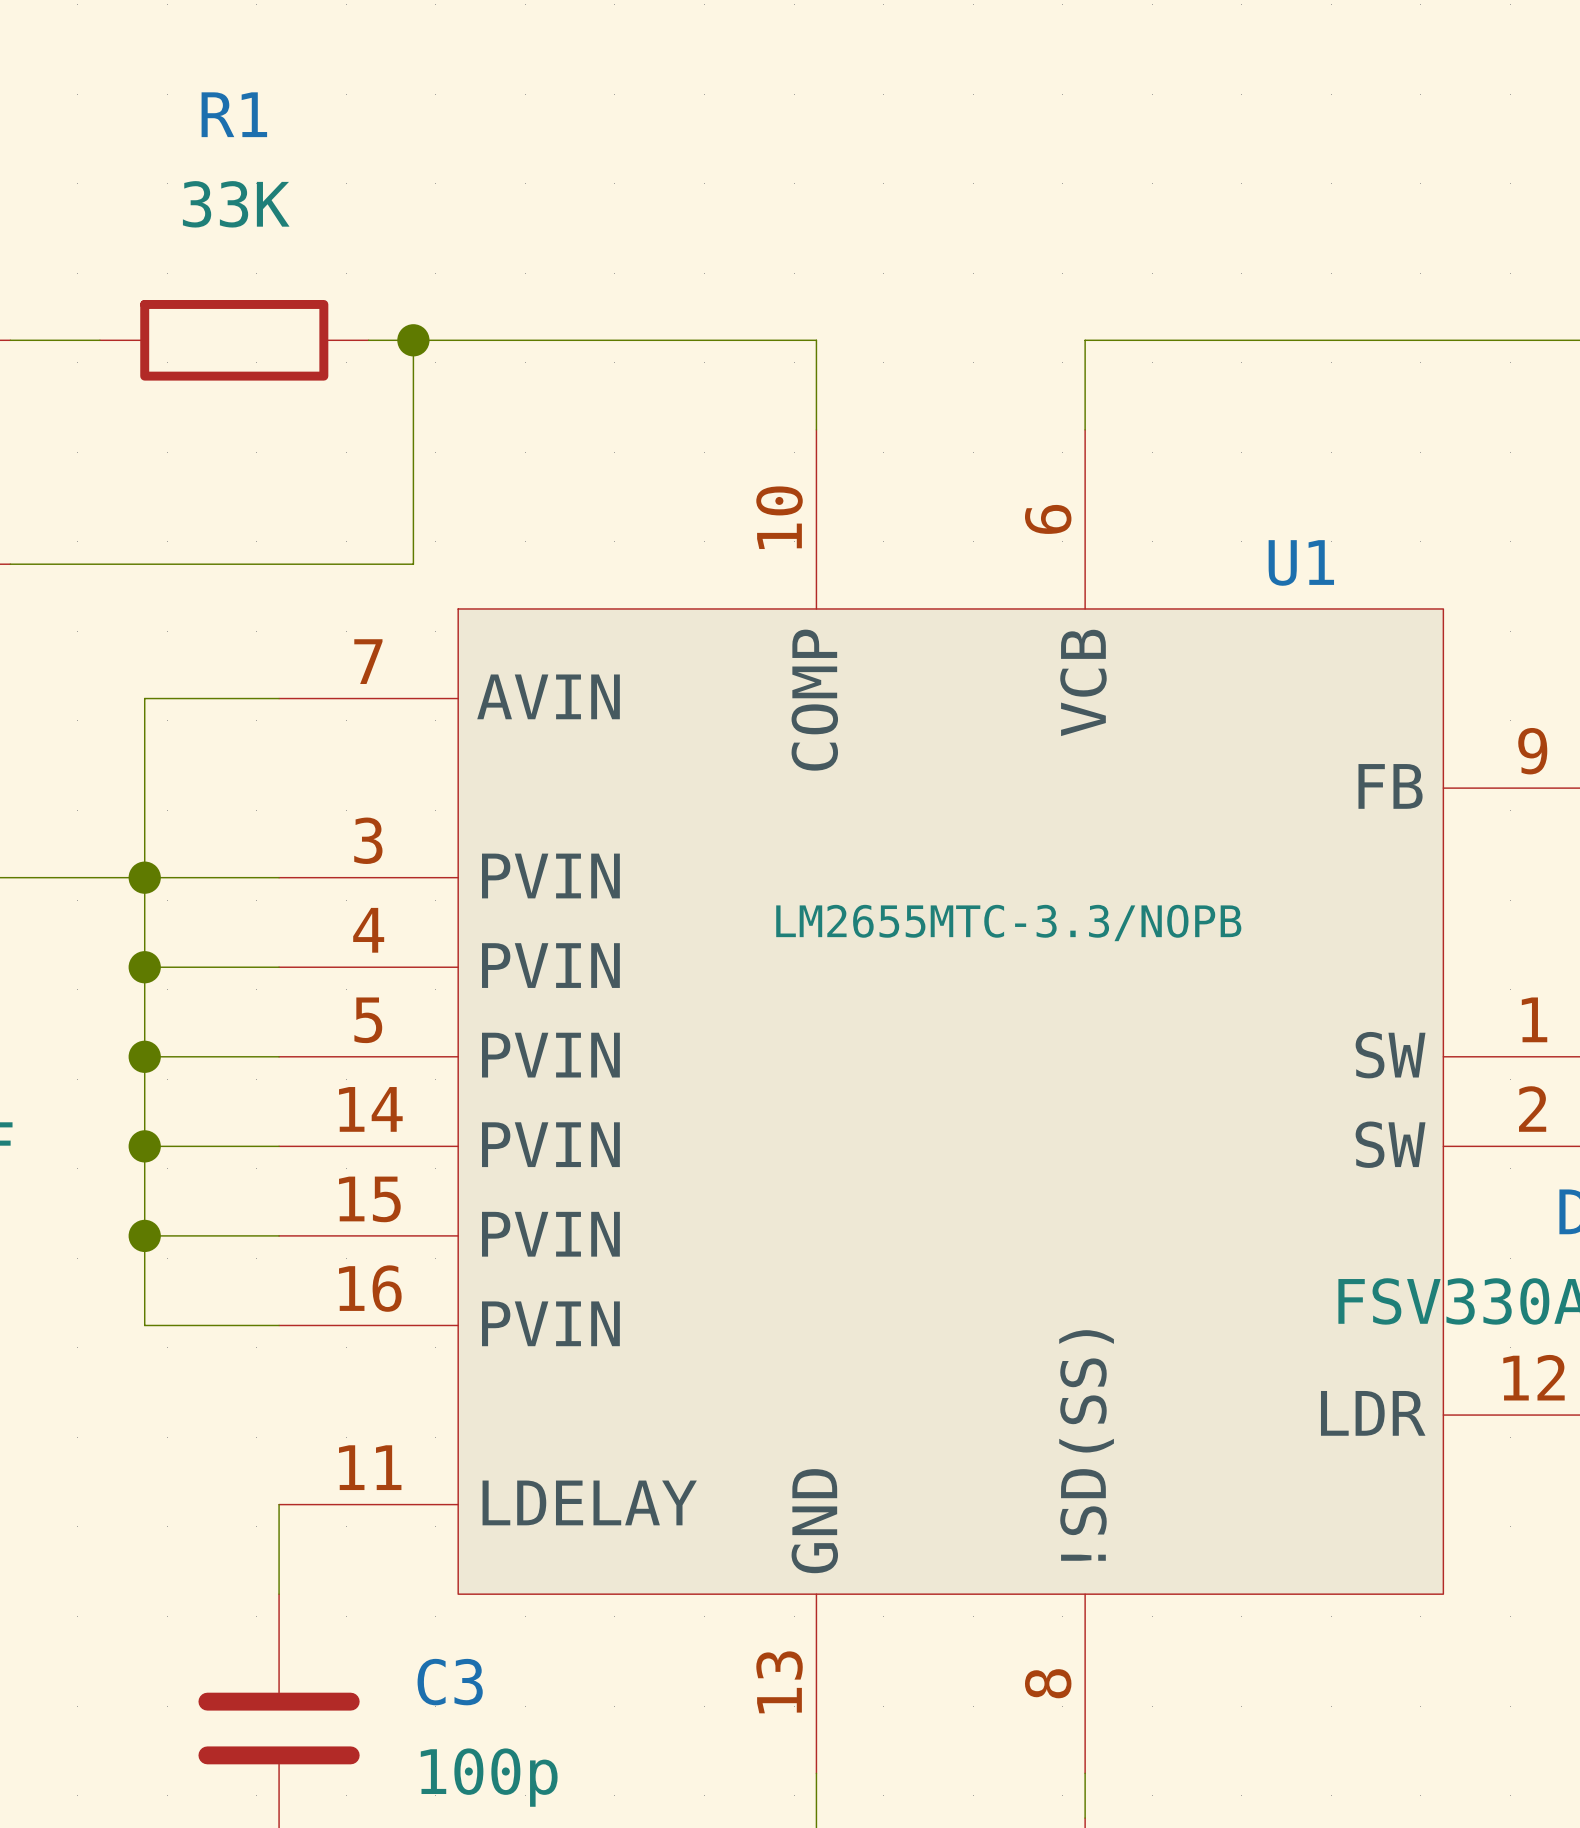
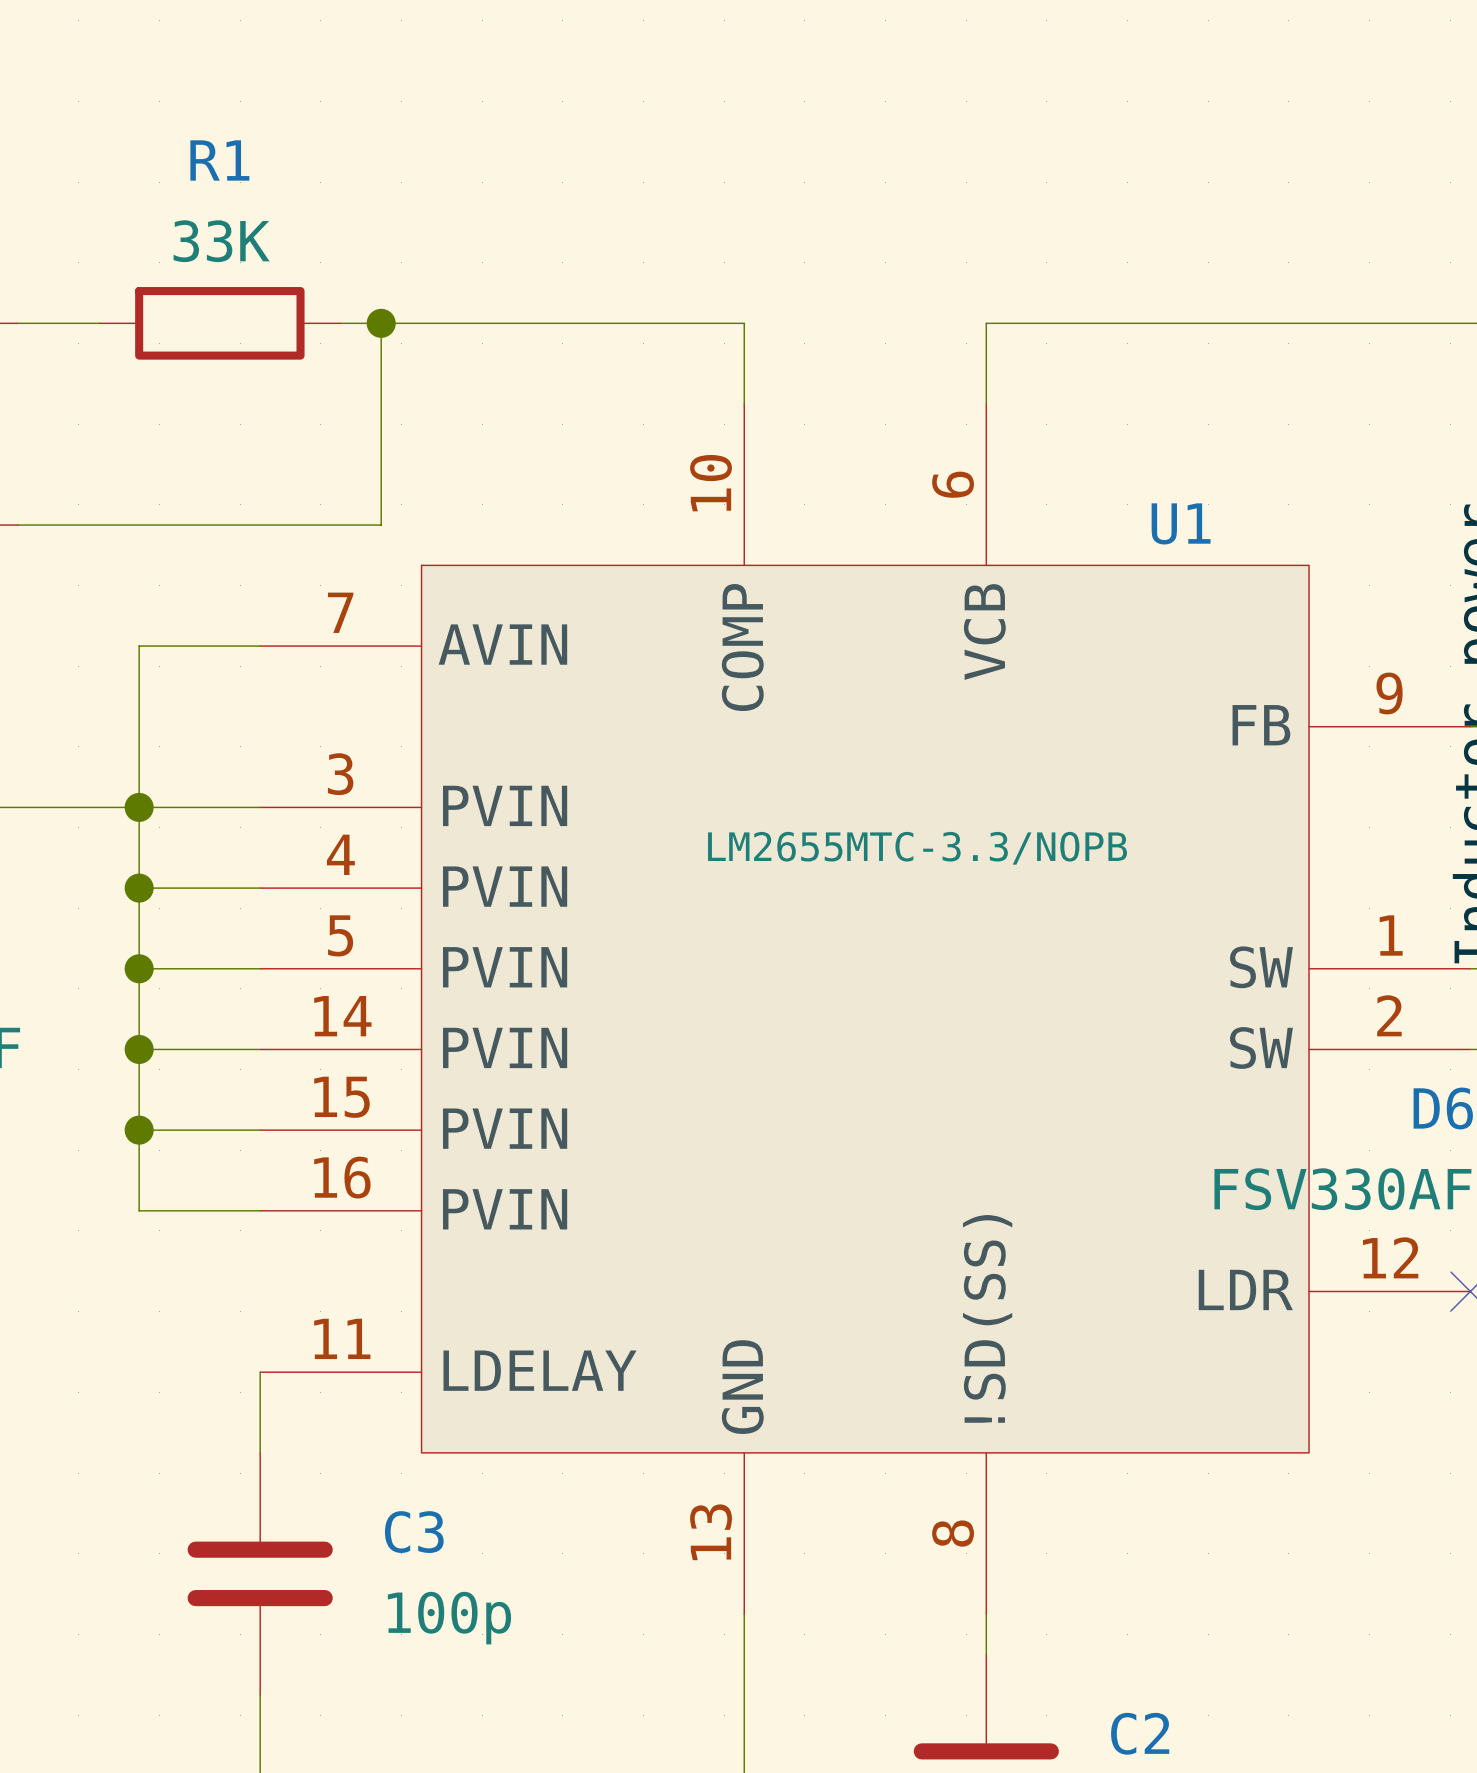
R1 name position: R1 (234, 114) -> R1 (219, 160)
R1 value position: 33K (236, 204) -> 33K (221, 241)

